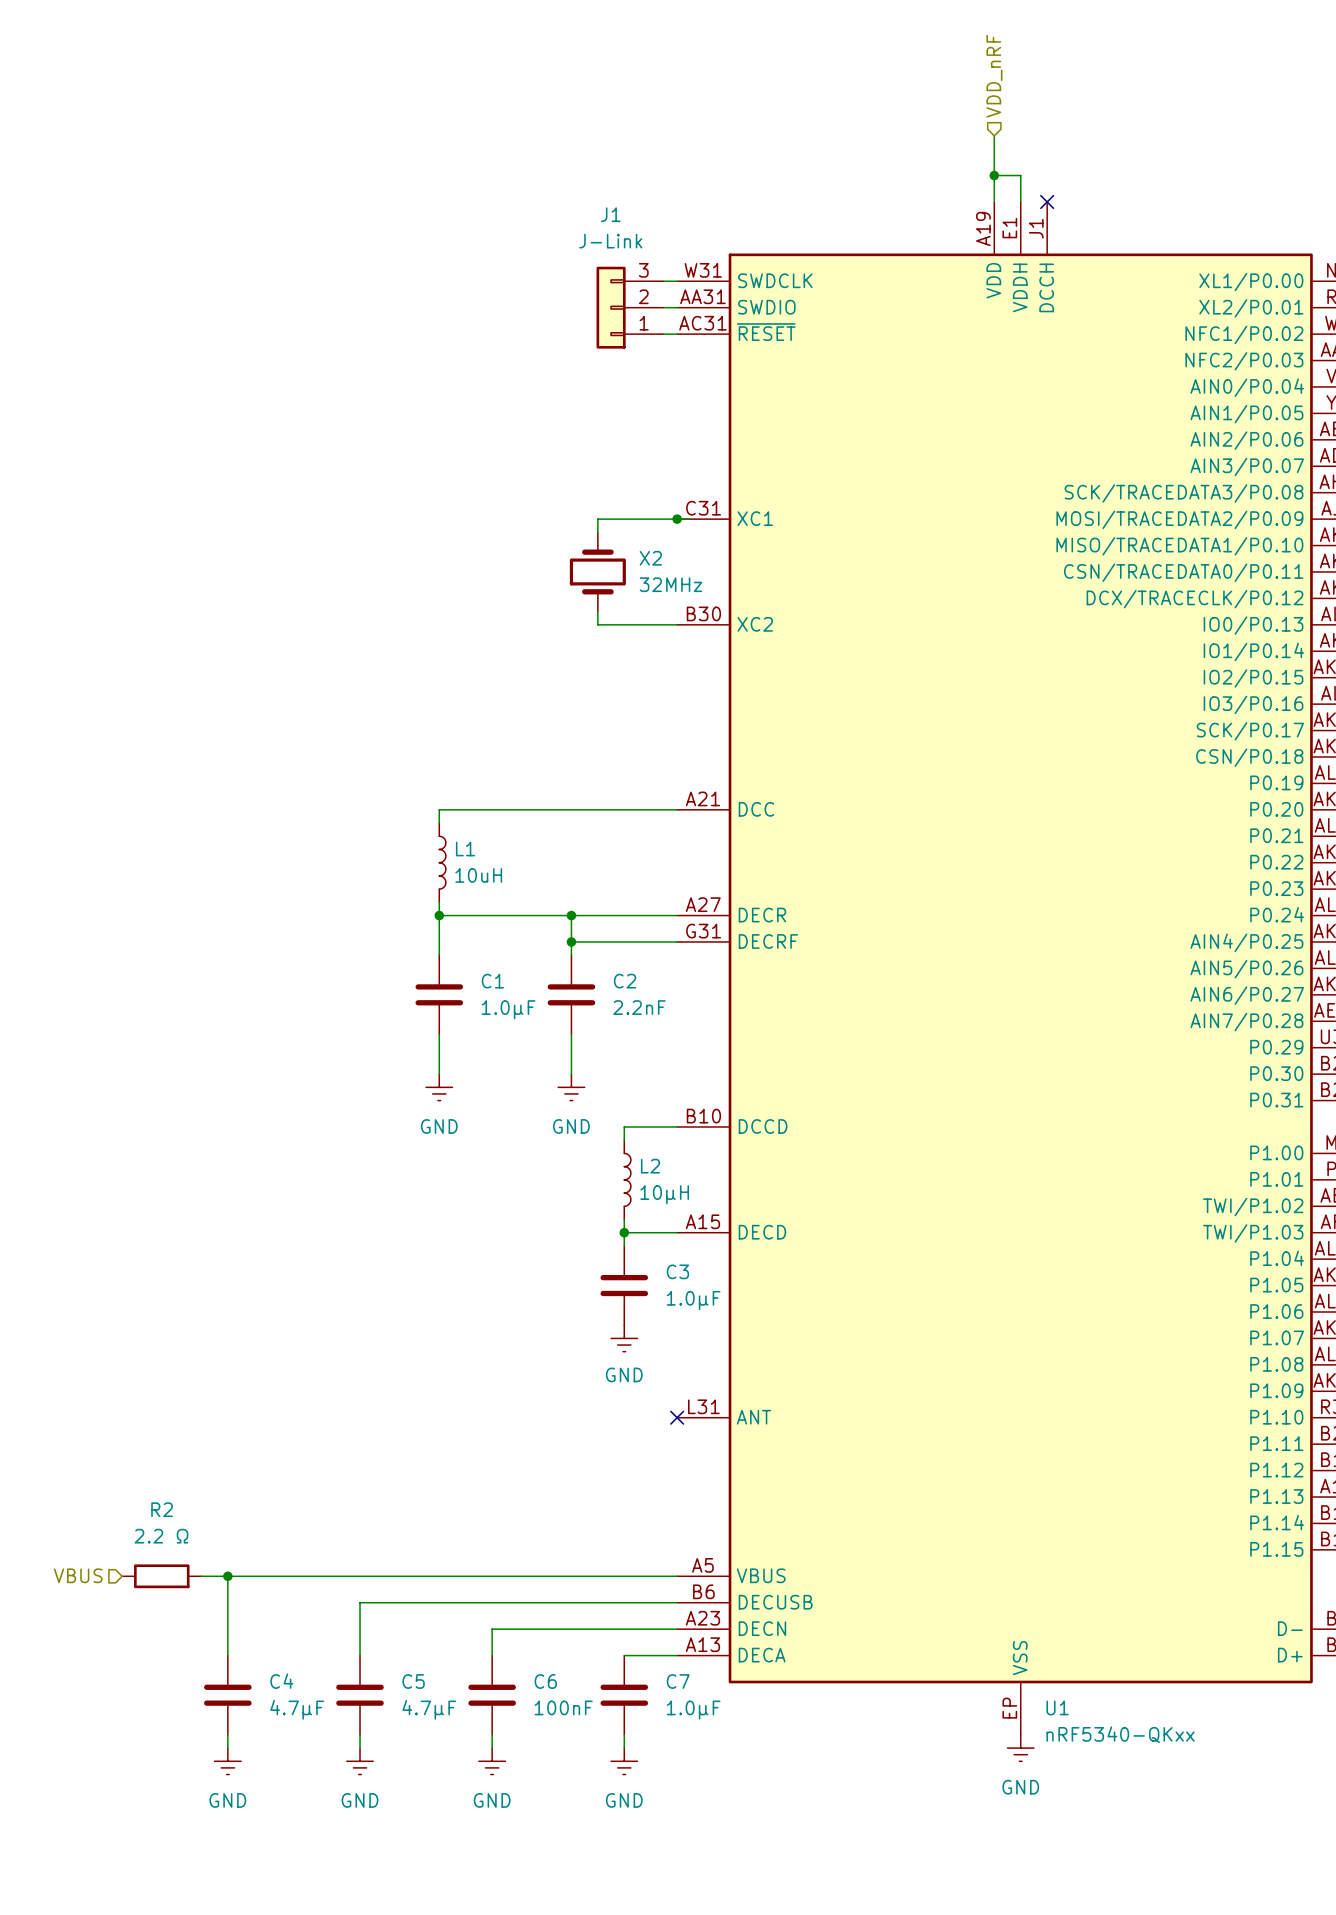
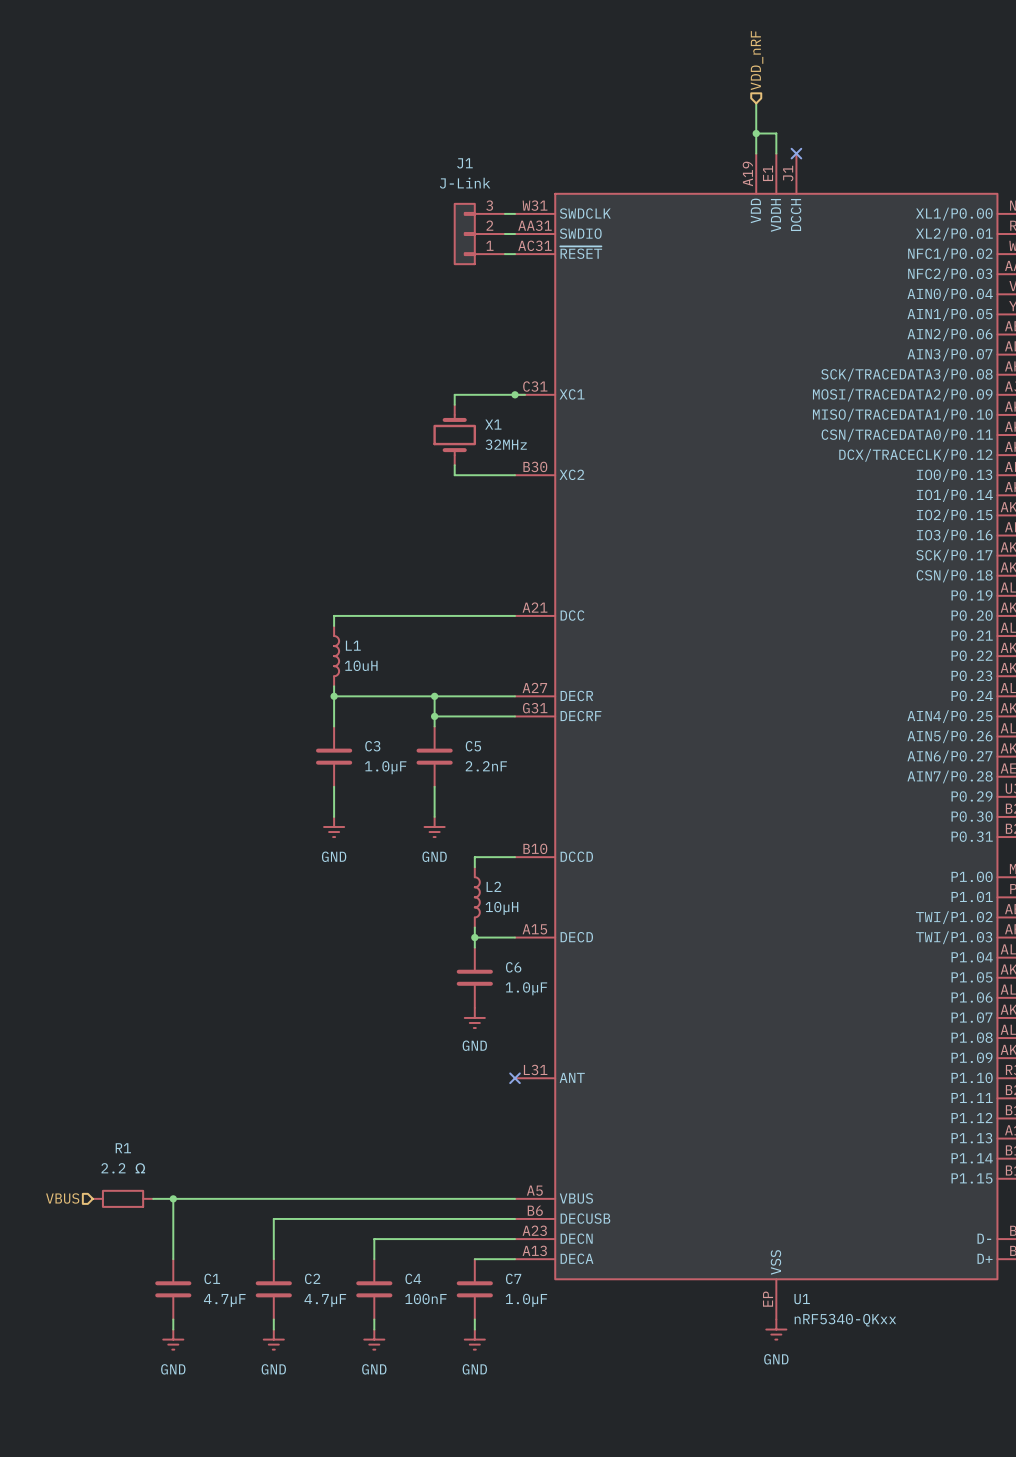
X2 name: X2 (650, 558) -> X1 (493, 424)
C1 name: C1 (492, 981) -> C3 (372, 746)
C2 name: C2 (625, 981) -> C5 (473, 746)
C3 name: C3 (677, 1271) -> C6 (513, 967)
R2 name: R2 (162, 1509) -> R1 (123, 1148)
C4 name: C4 (281, 1681) -> C1 (212, 1278)
C5 name: C5 (413, 1681) -> C2 (312, 1278)
C6 name: C6 (545, 1681) -> C4 (413, 1278)

